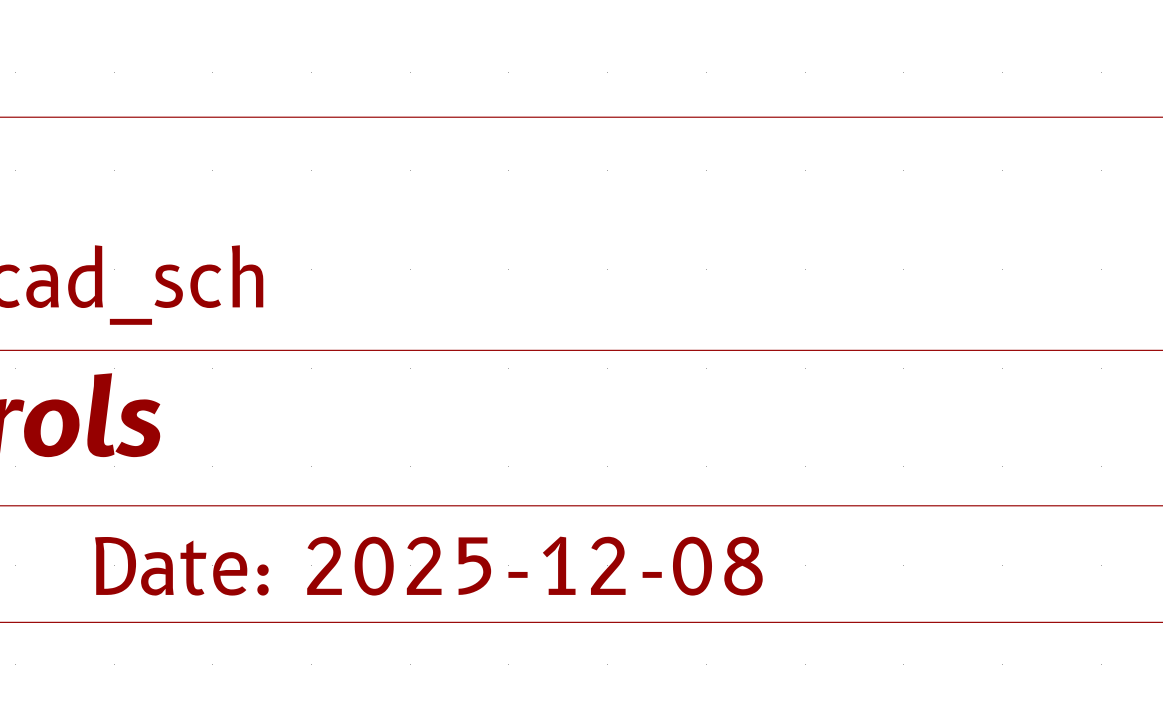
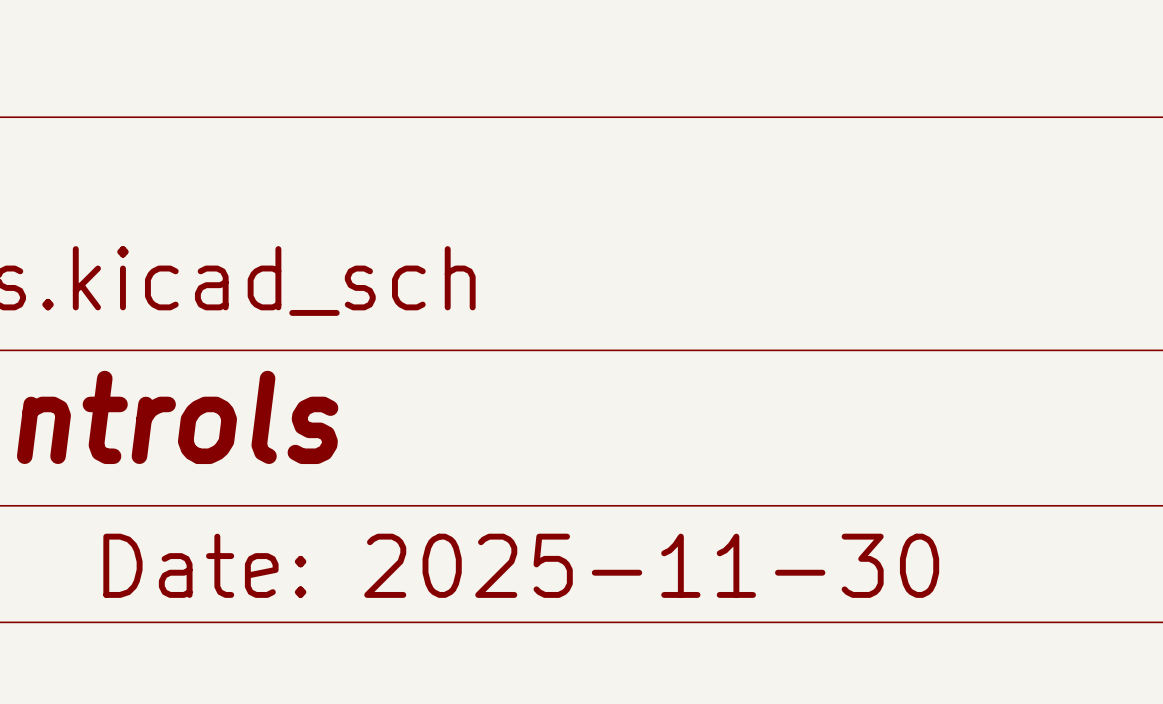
title block: Date: 2025-12-08 (428, 566) -> Date: 2025-11-30 (521, 565)

